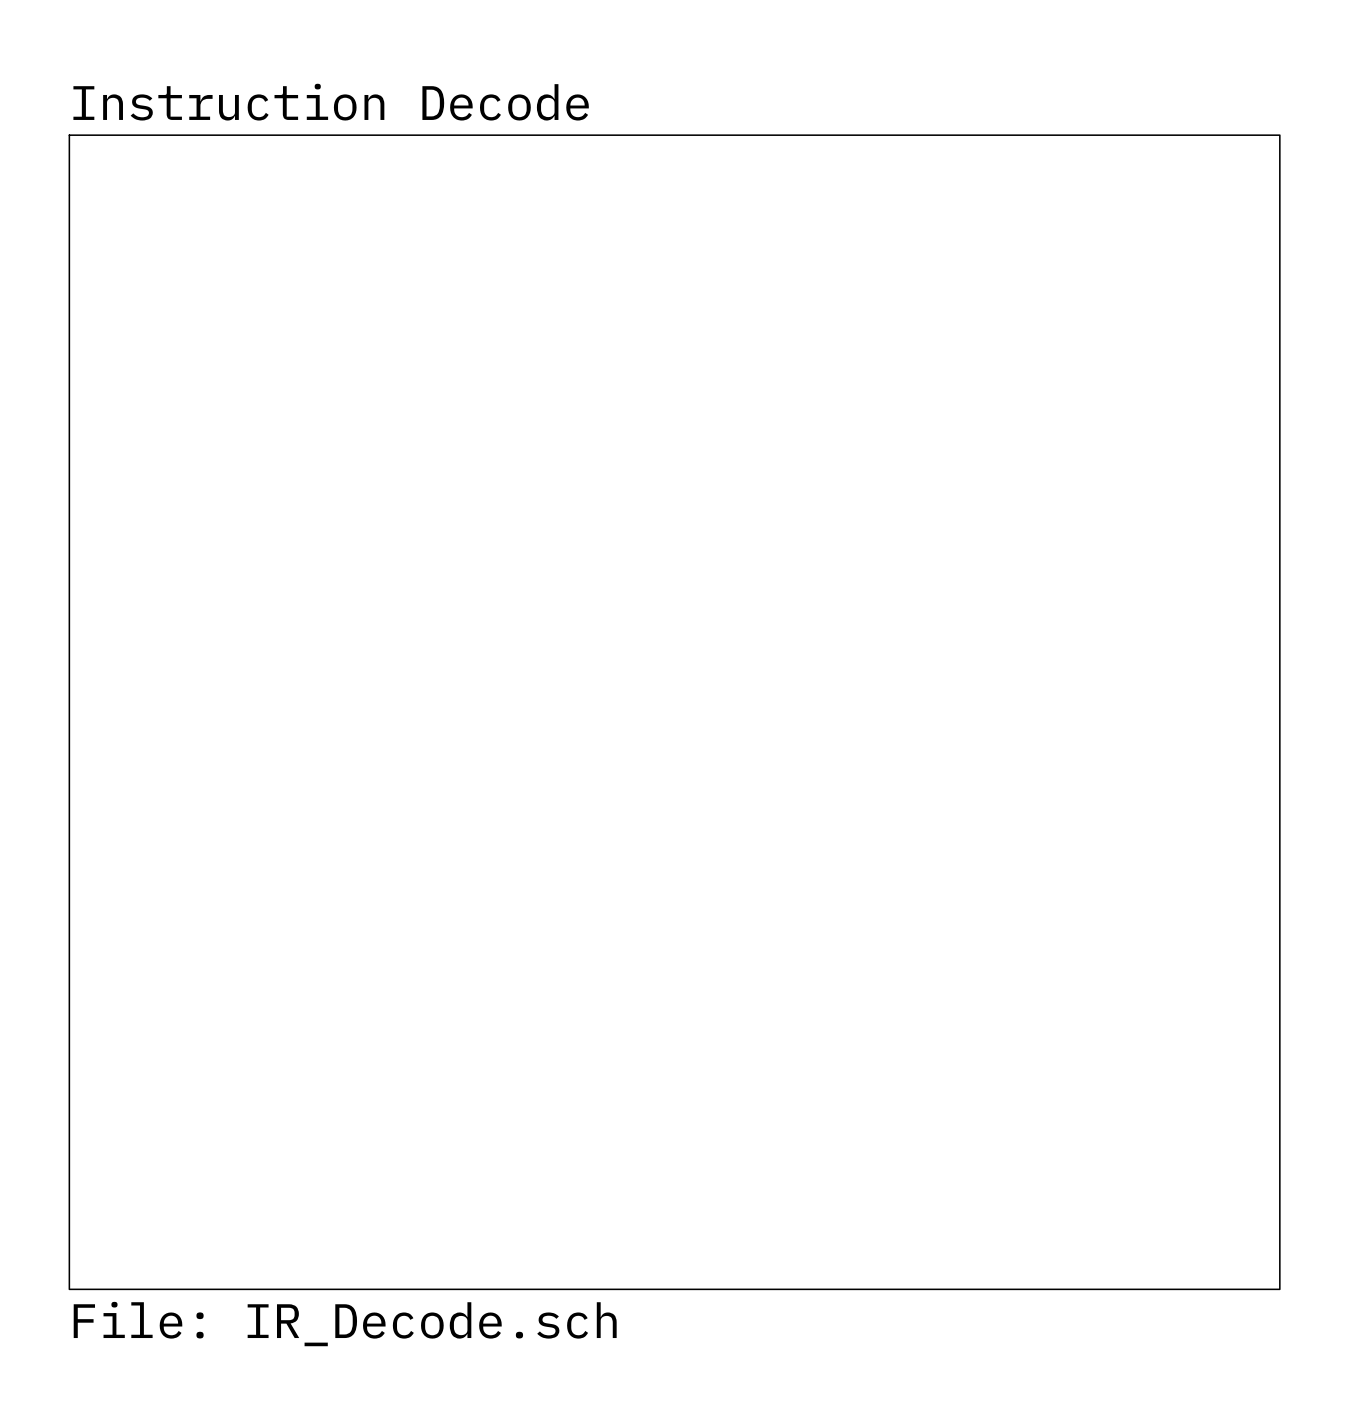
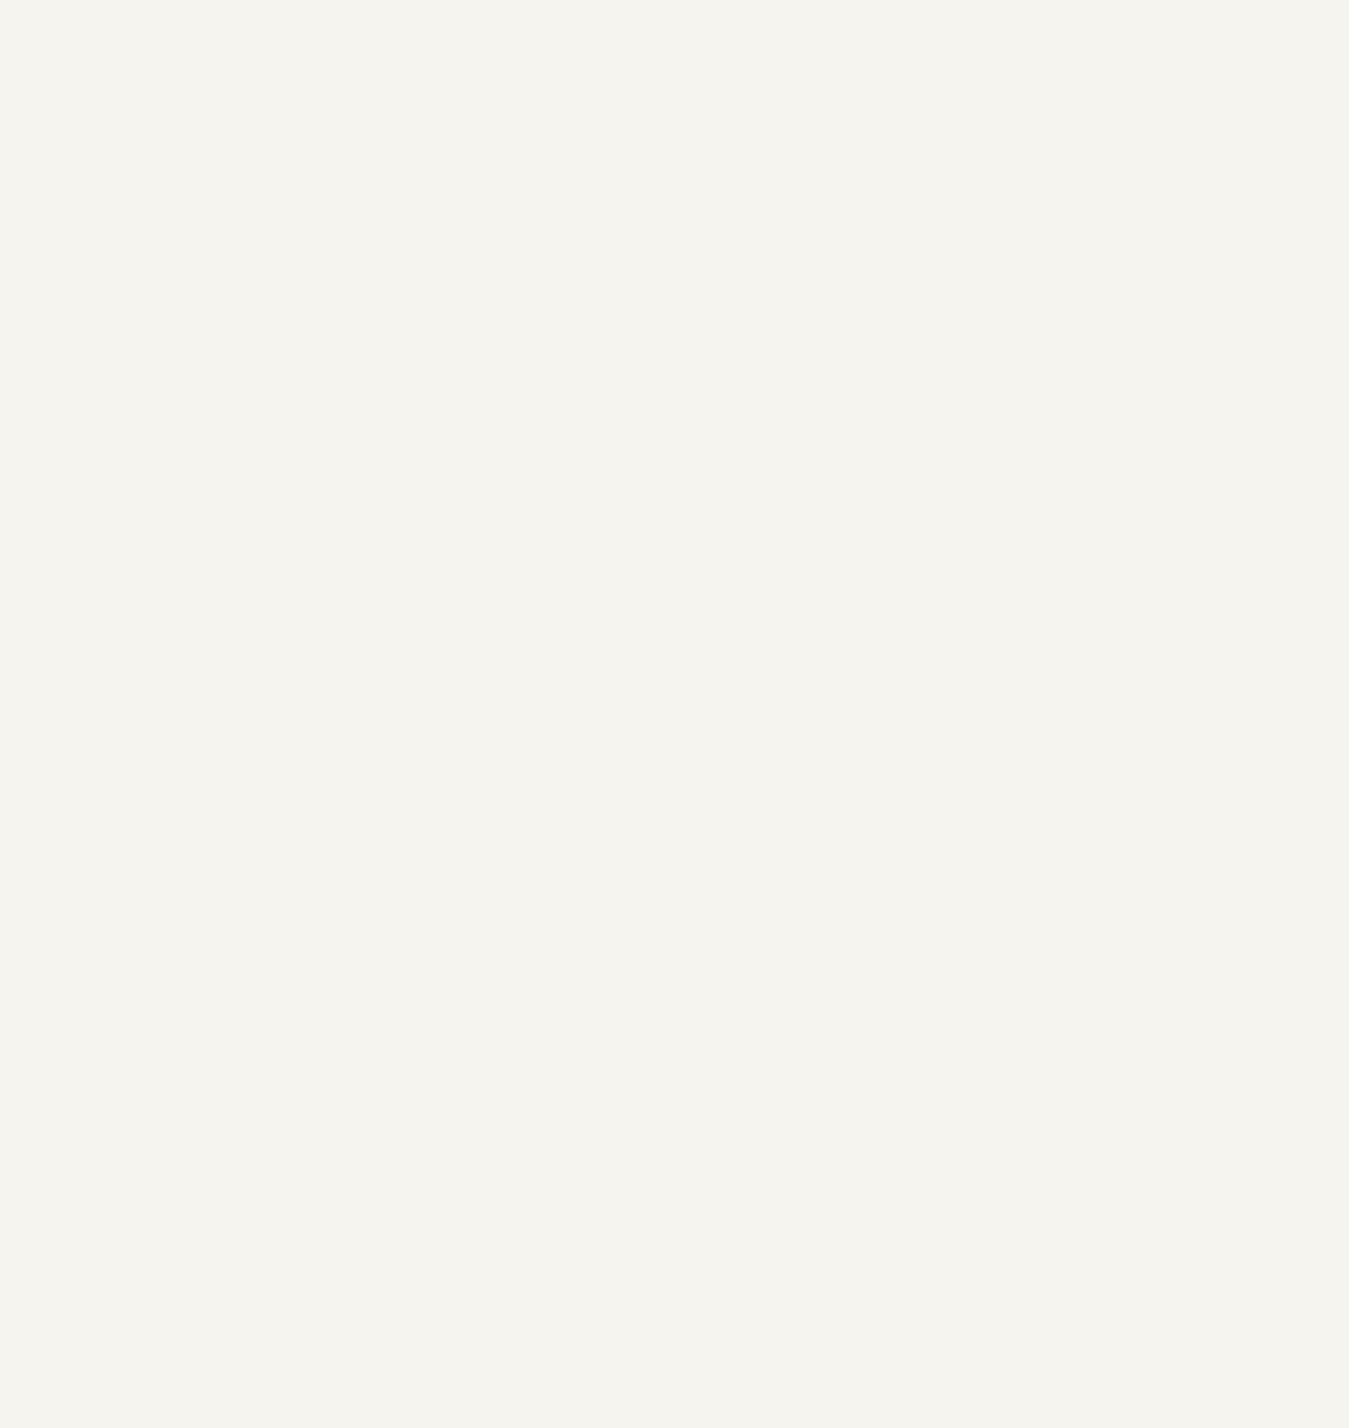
sheet Instruction Decode: File: IR_Decode.sch (674, 712) -> none

